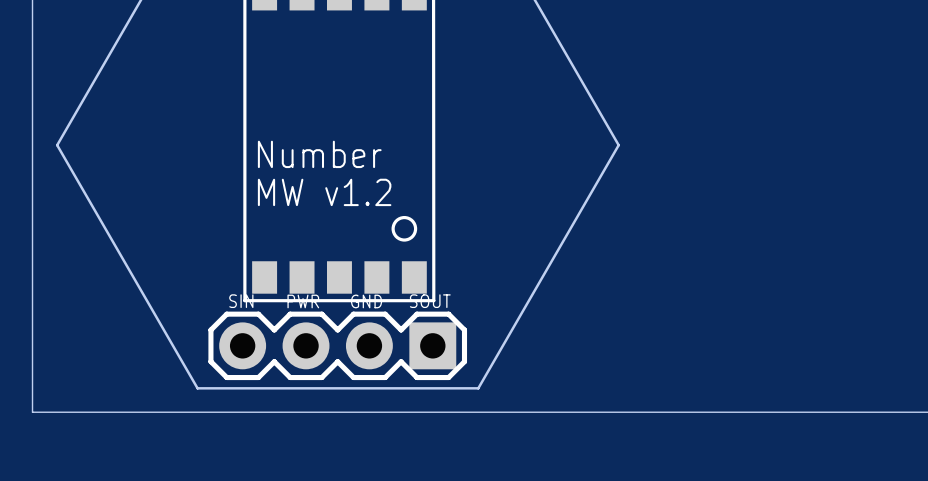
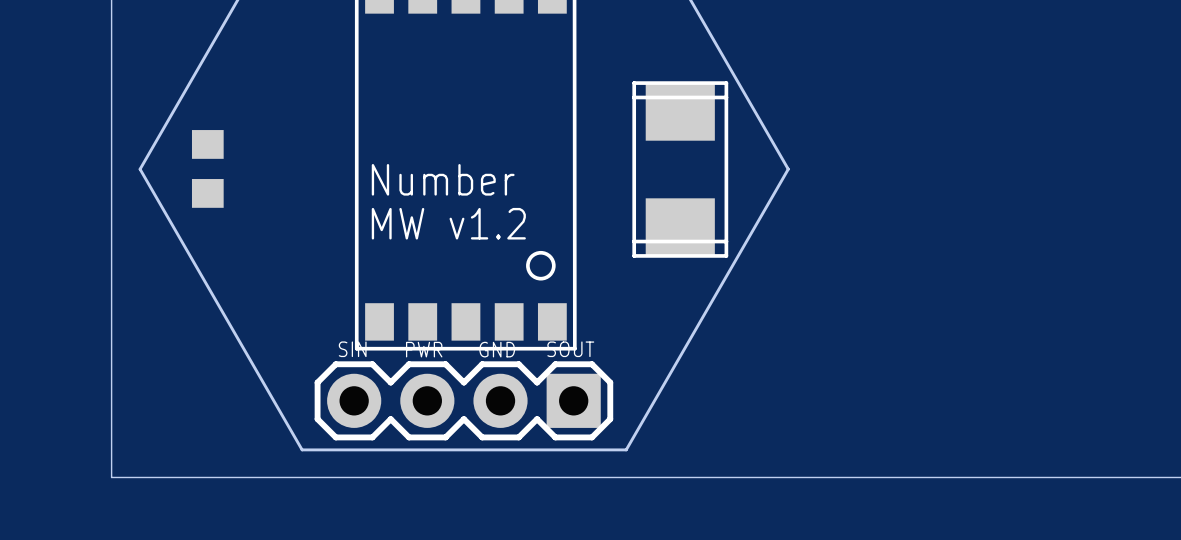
part: none -> (207, 168)
part: none -> (680, 169)

